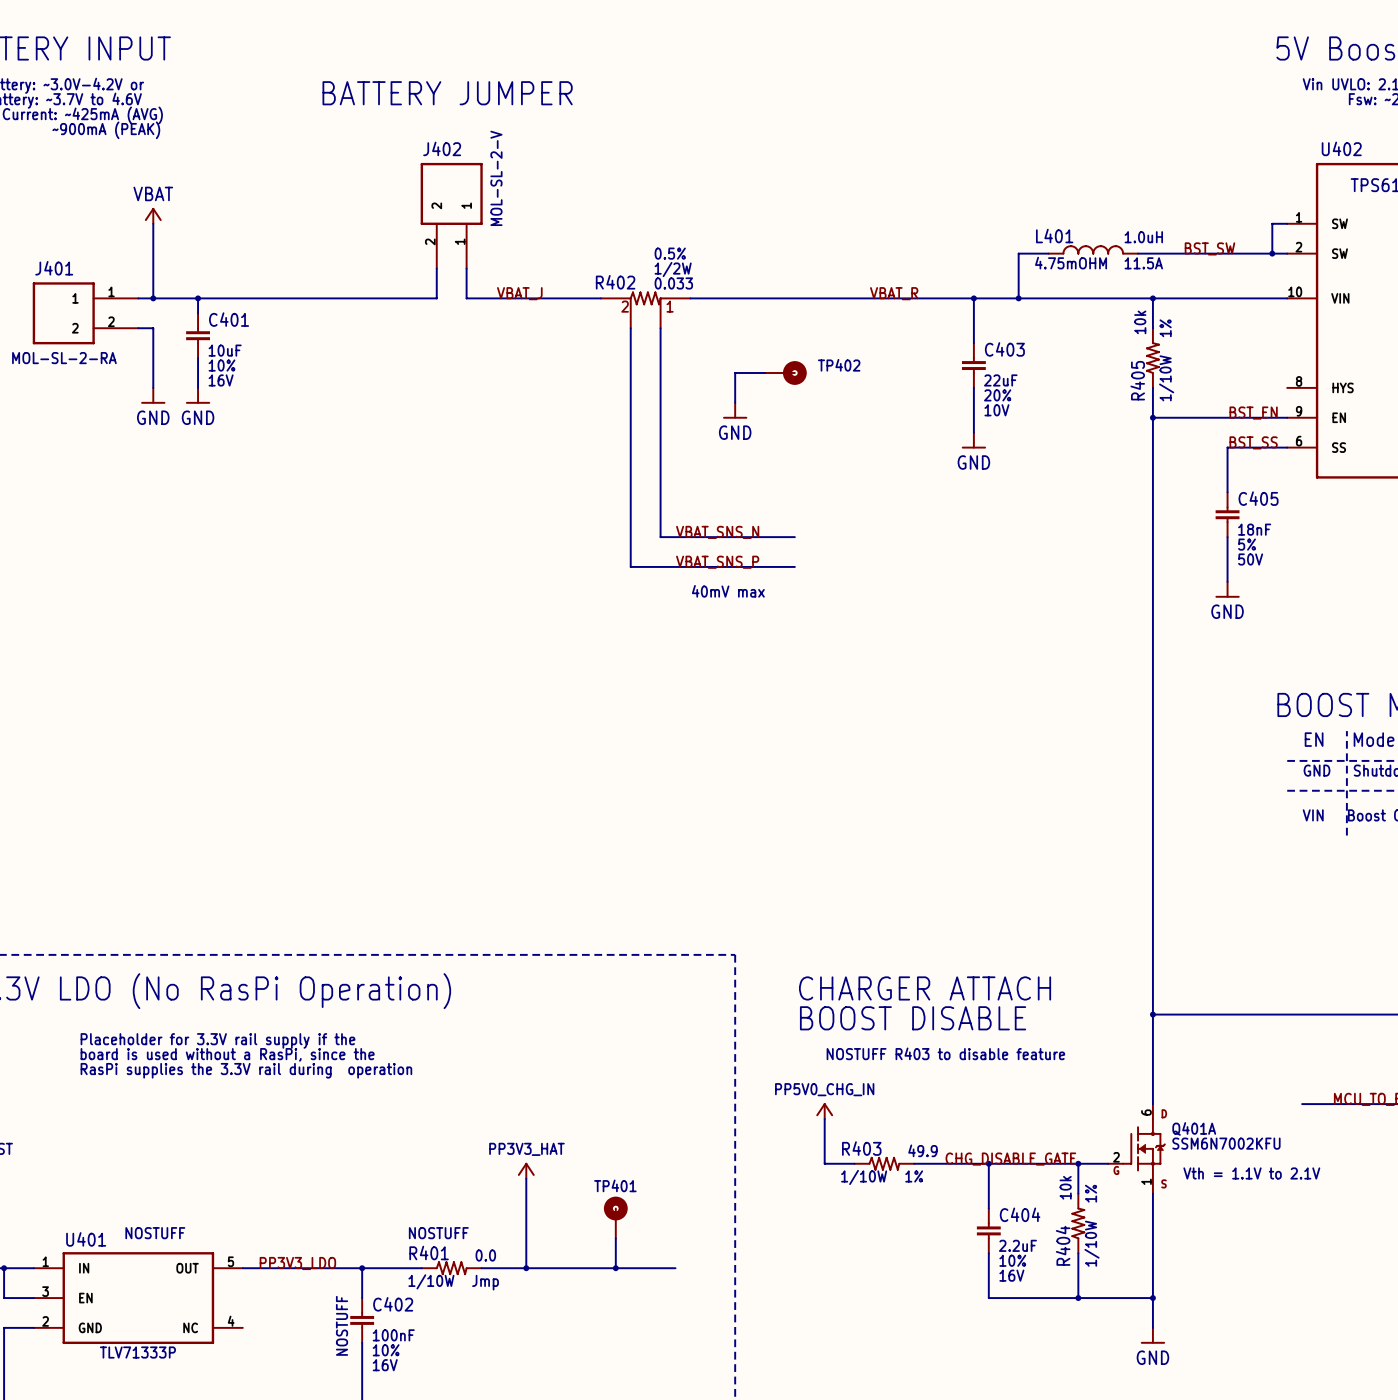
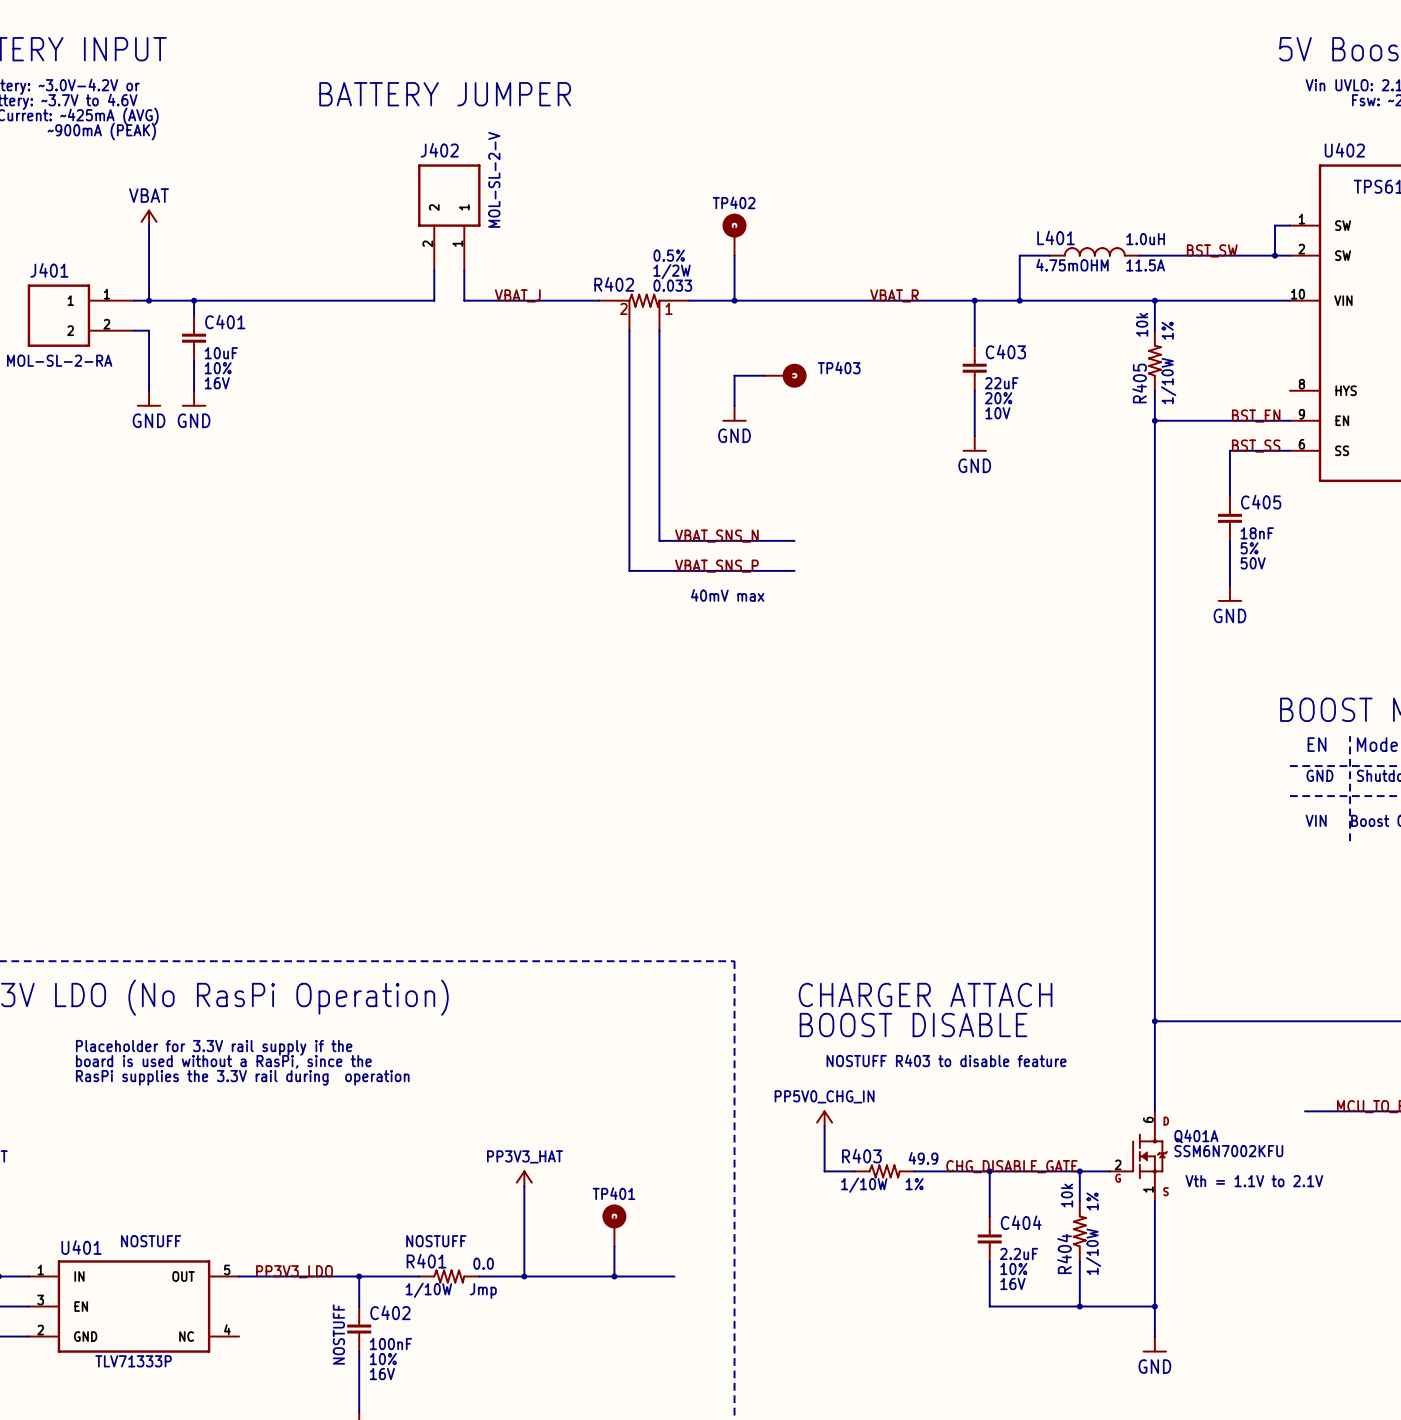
TP402: none -> (734, 234)
wire: none -> (734, 255) (734, 300)
junction: none -> (734, 300)
TP402 name: TP402 (839, 365) -> TP403 (839, 367)

